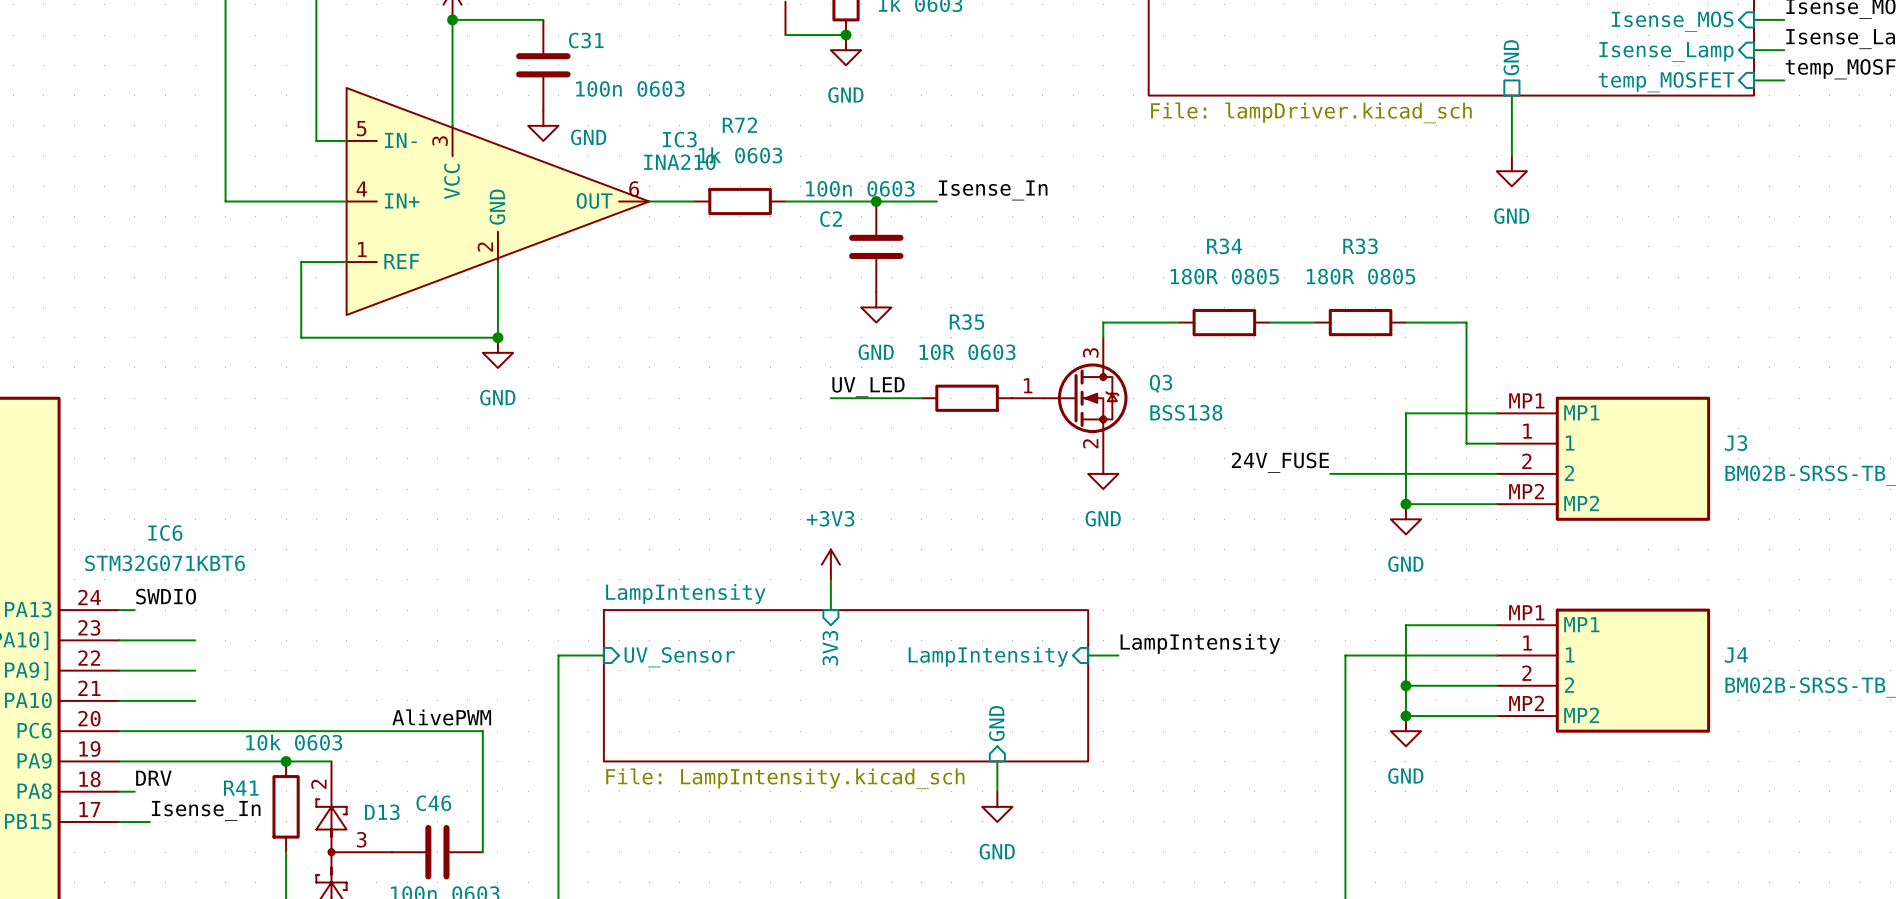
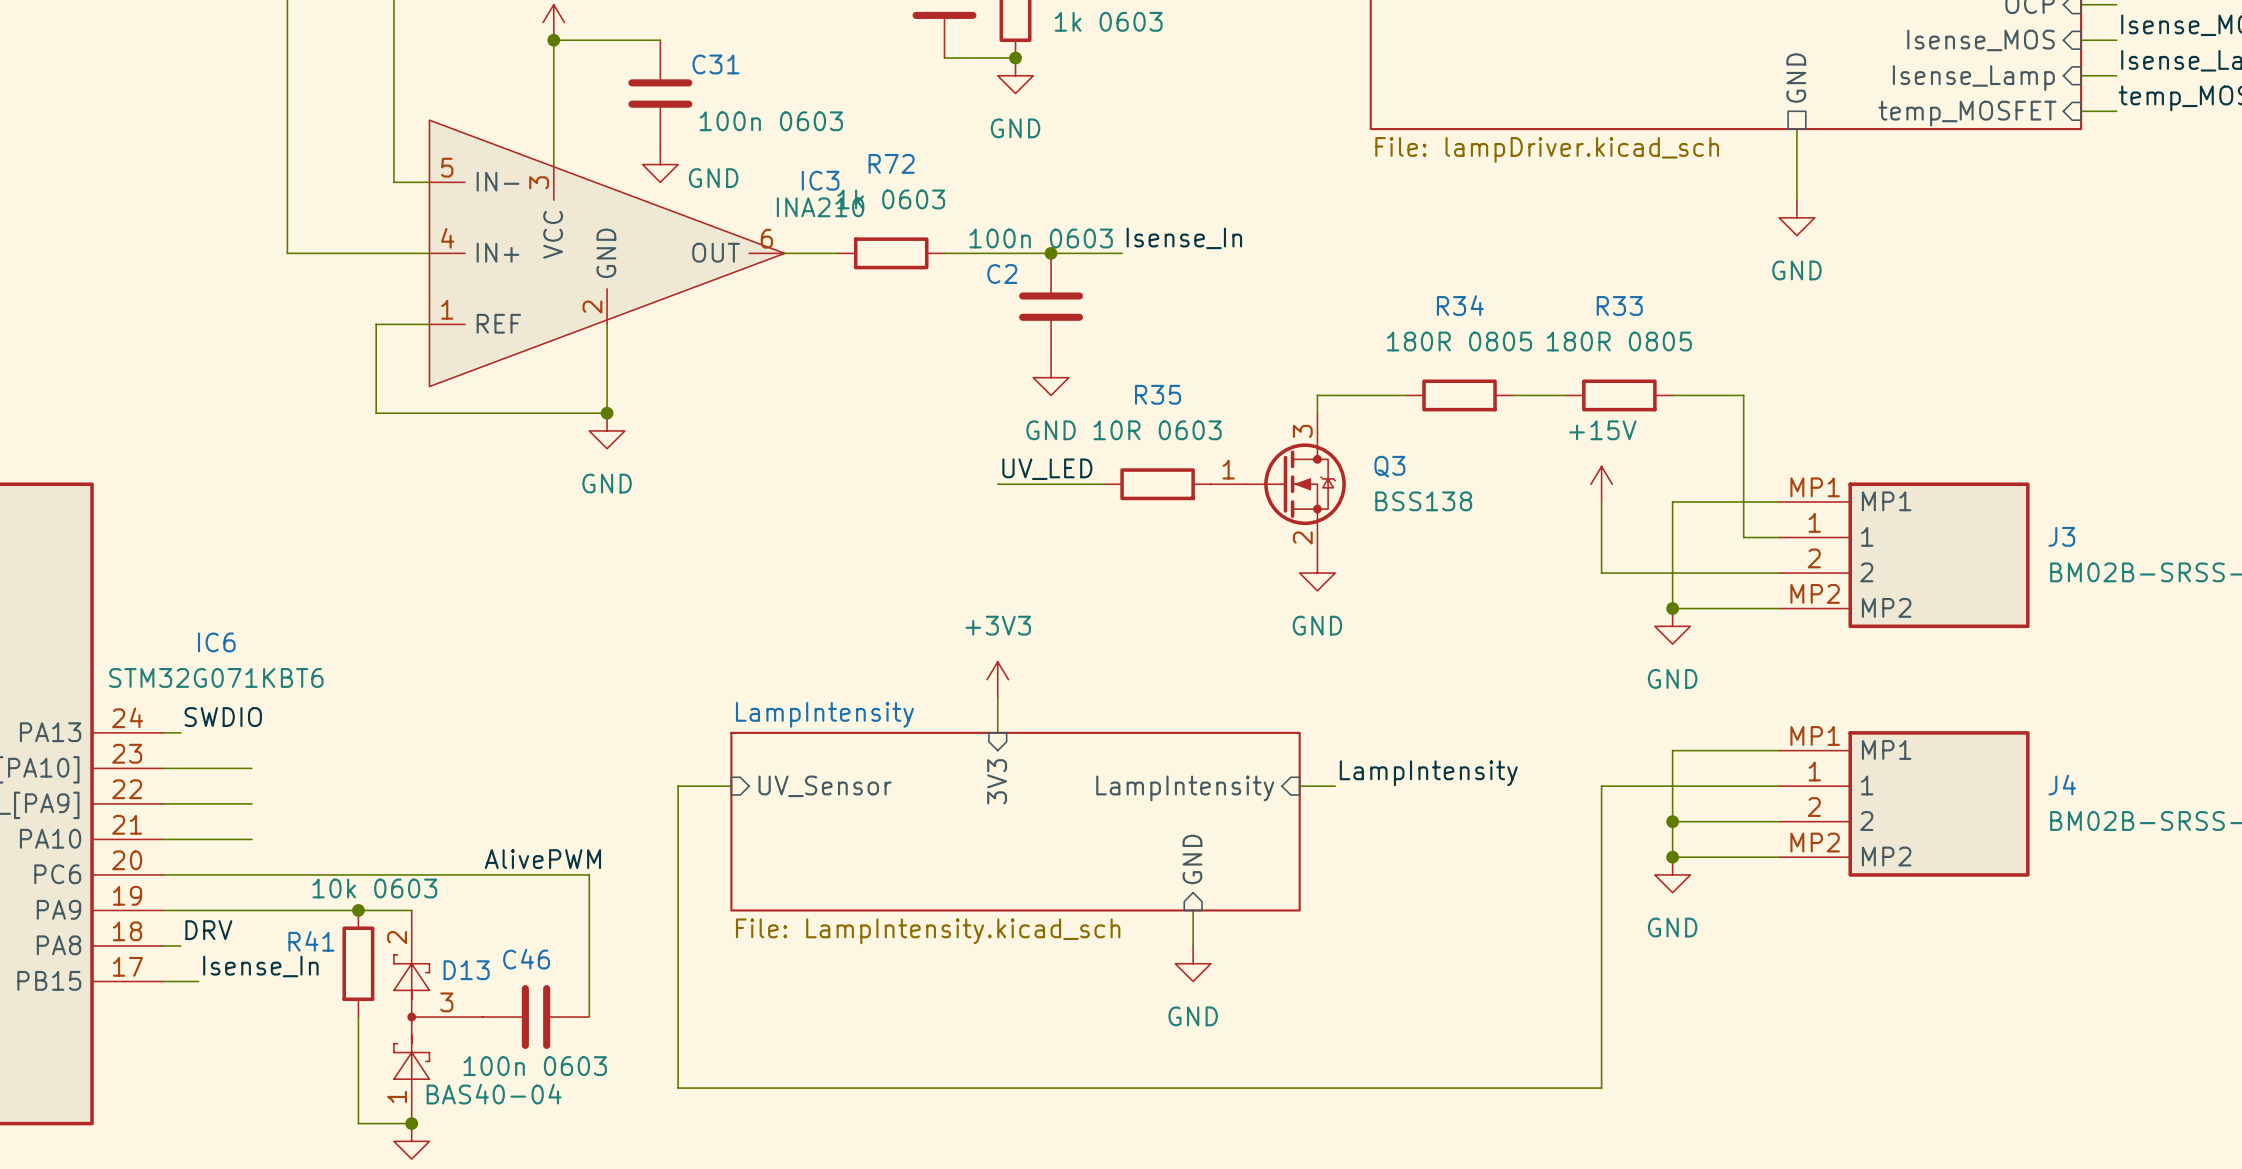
power symbol: none -> +15V (1601, 484)
label: 24V_FUSE (1280, 462) -> none
wire: (1330, 473) (1345, 473) -> (1601, 502) (1601, 573)

